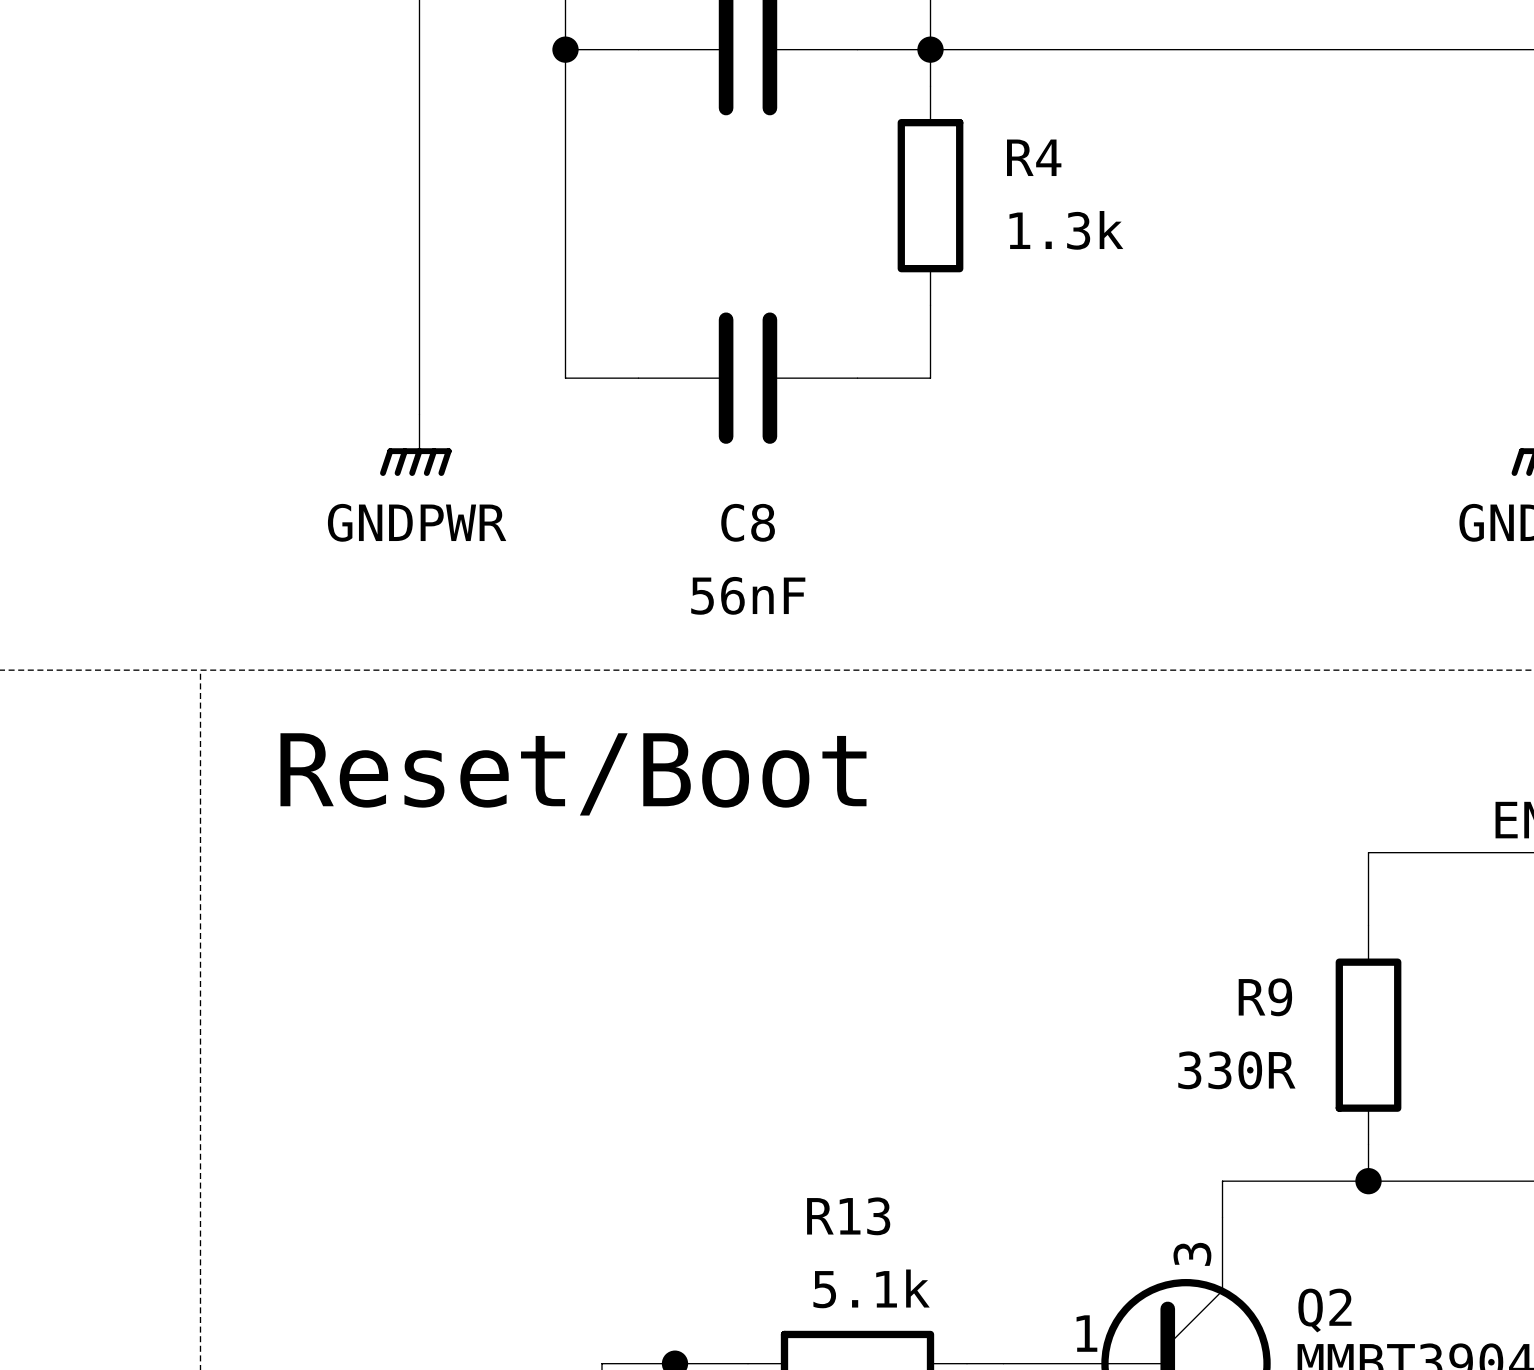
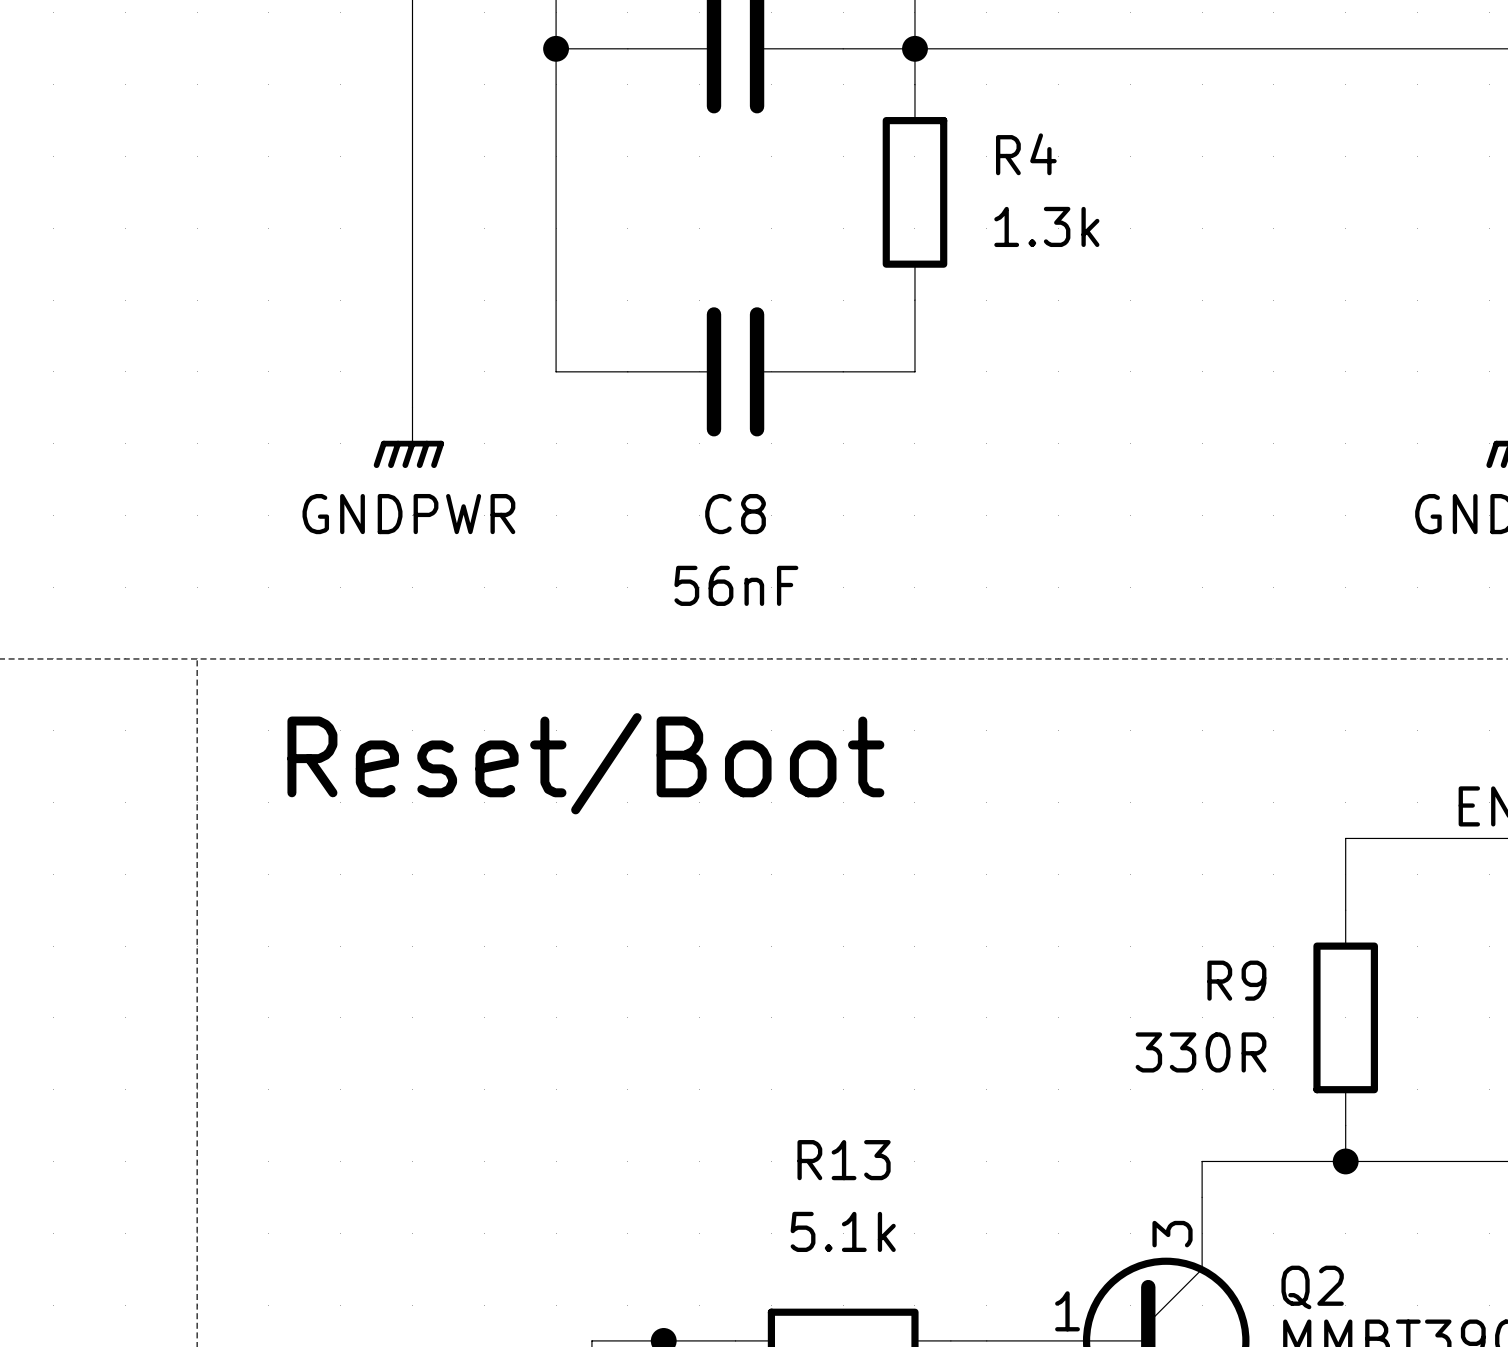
R13 name position: R13 (848, 1216) -> R13 (844, 1160)
R13 value position: 5.1k (871, 1288) -> 5.1k (843, 1231)

